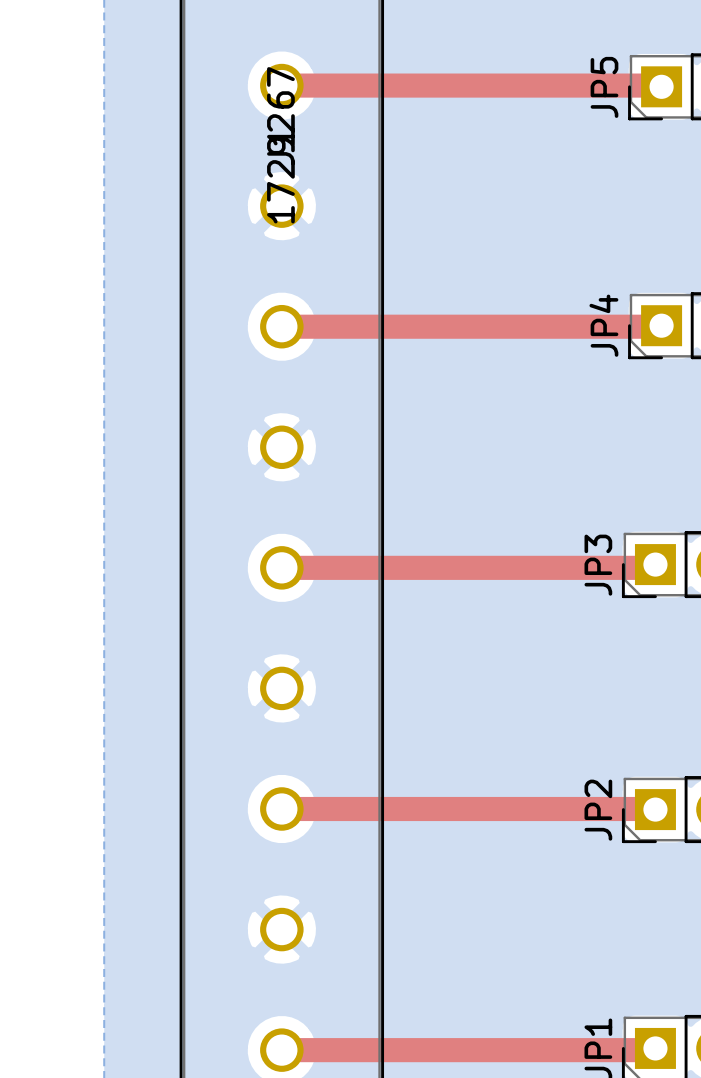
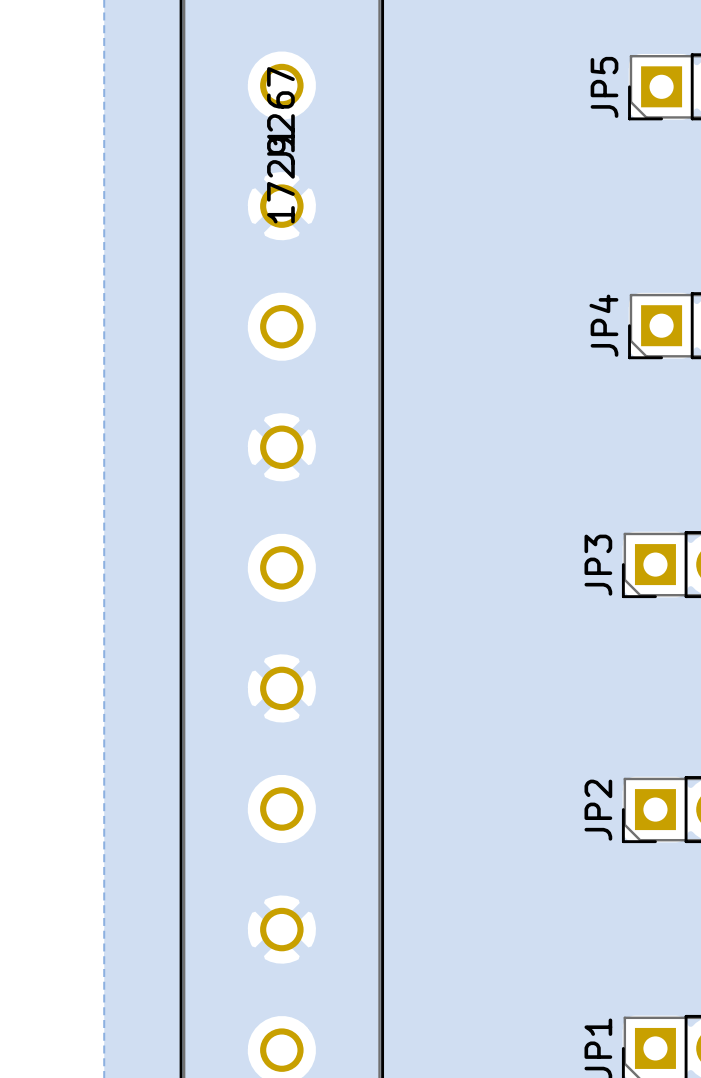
top track: (281, 85) (660, 85) -> none
top track: (661, 325) (281, 326) -> none
top track: (655, 564) (652, 567) (281, 567) -> none
top track: (281, 808) (655, 809) -> none
top track: (655, 1048) (653, 1050) (281, 1050) -> none

